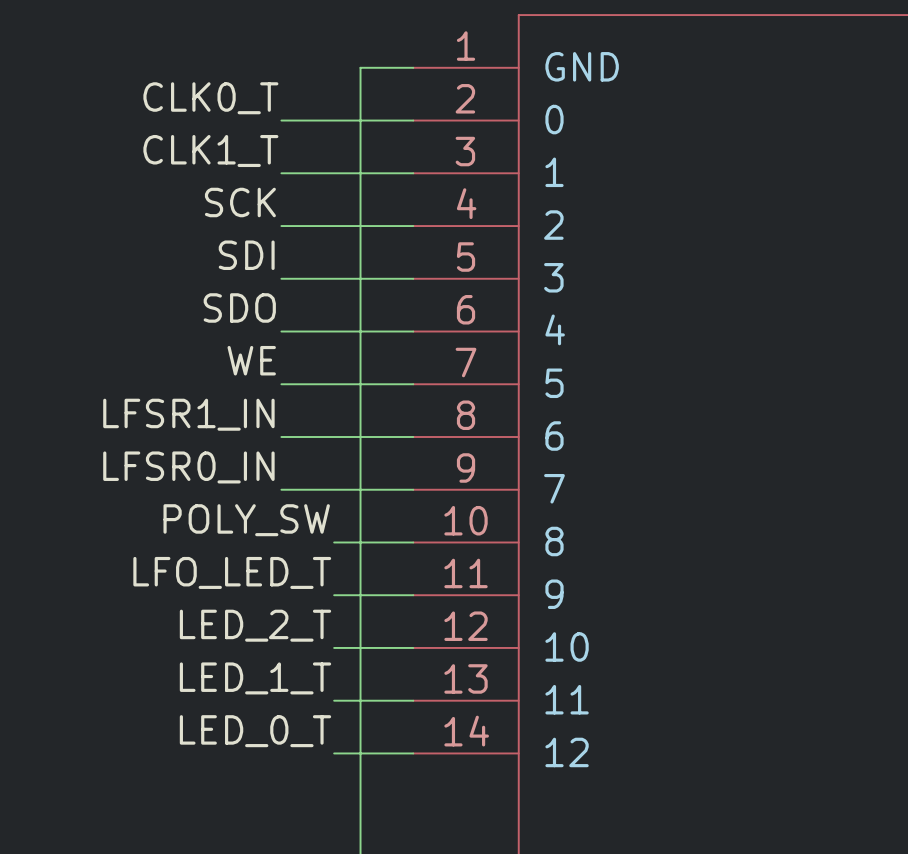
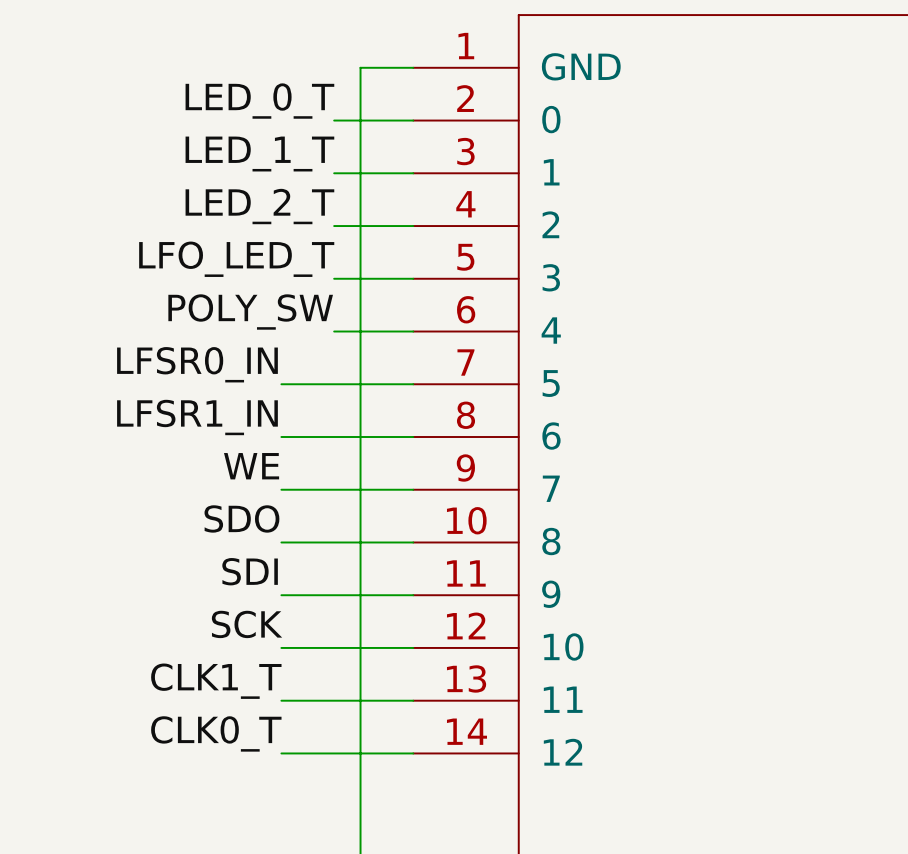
label: CLK0_T (210, 98) -> LED_0_T (259, 101)
wire: (281, 120) (334, 120) -> (281, 542) (334, 542)
label: CLK1_T (210, 151) -> LED_1_T (259, 154)
wire: (281, 173) (334, 173) -> (281, 595) (334, 595)
label position: SCK (240, 202) -> SCK (247, 624)
wire: (281, 226) (334, 226) -> (281, 647) (334, 647)
label position: SDI (246, 255) -> SDI (250, 571)
wire: (281, 278) (334, 278) -> (281, 700) (334, 700)
label position: SDO (239, 307) -> SDO (241, 518)
wire: (281, 331) (334, 331) -> (281, 753) (334, 753)
label: WE (251, 360) -> LFSR0_IN (197, 364)
label: LFSR0_IN (188, 467) -> WE (251, 466)
label position: POLY_SW (246, 520) -> POLY_SW (250, 312)
label position: LFO_LED_T (232, 572) -> LFO_LED_T (236, 259)
label position: LED_2_T (255, 625) -> LED_2_T (259, 206)
label: LED_1_T (255, 678) -> CLK1_T (216, 681)
label: LED_0_T (255, 731) -> CLK0_T (216, 733)

